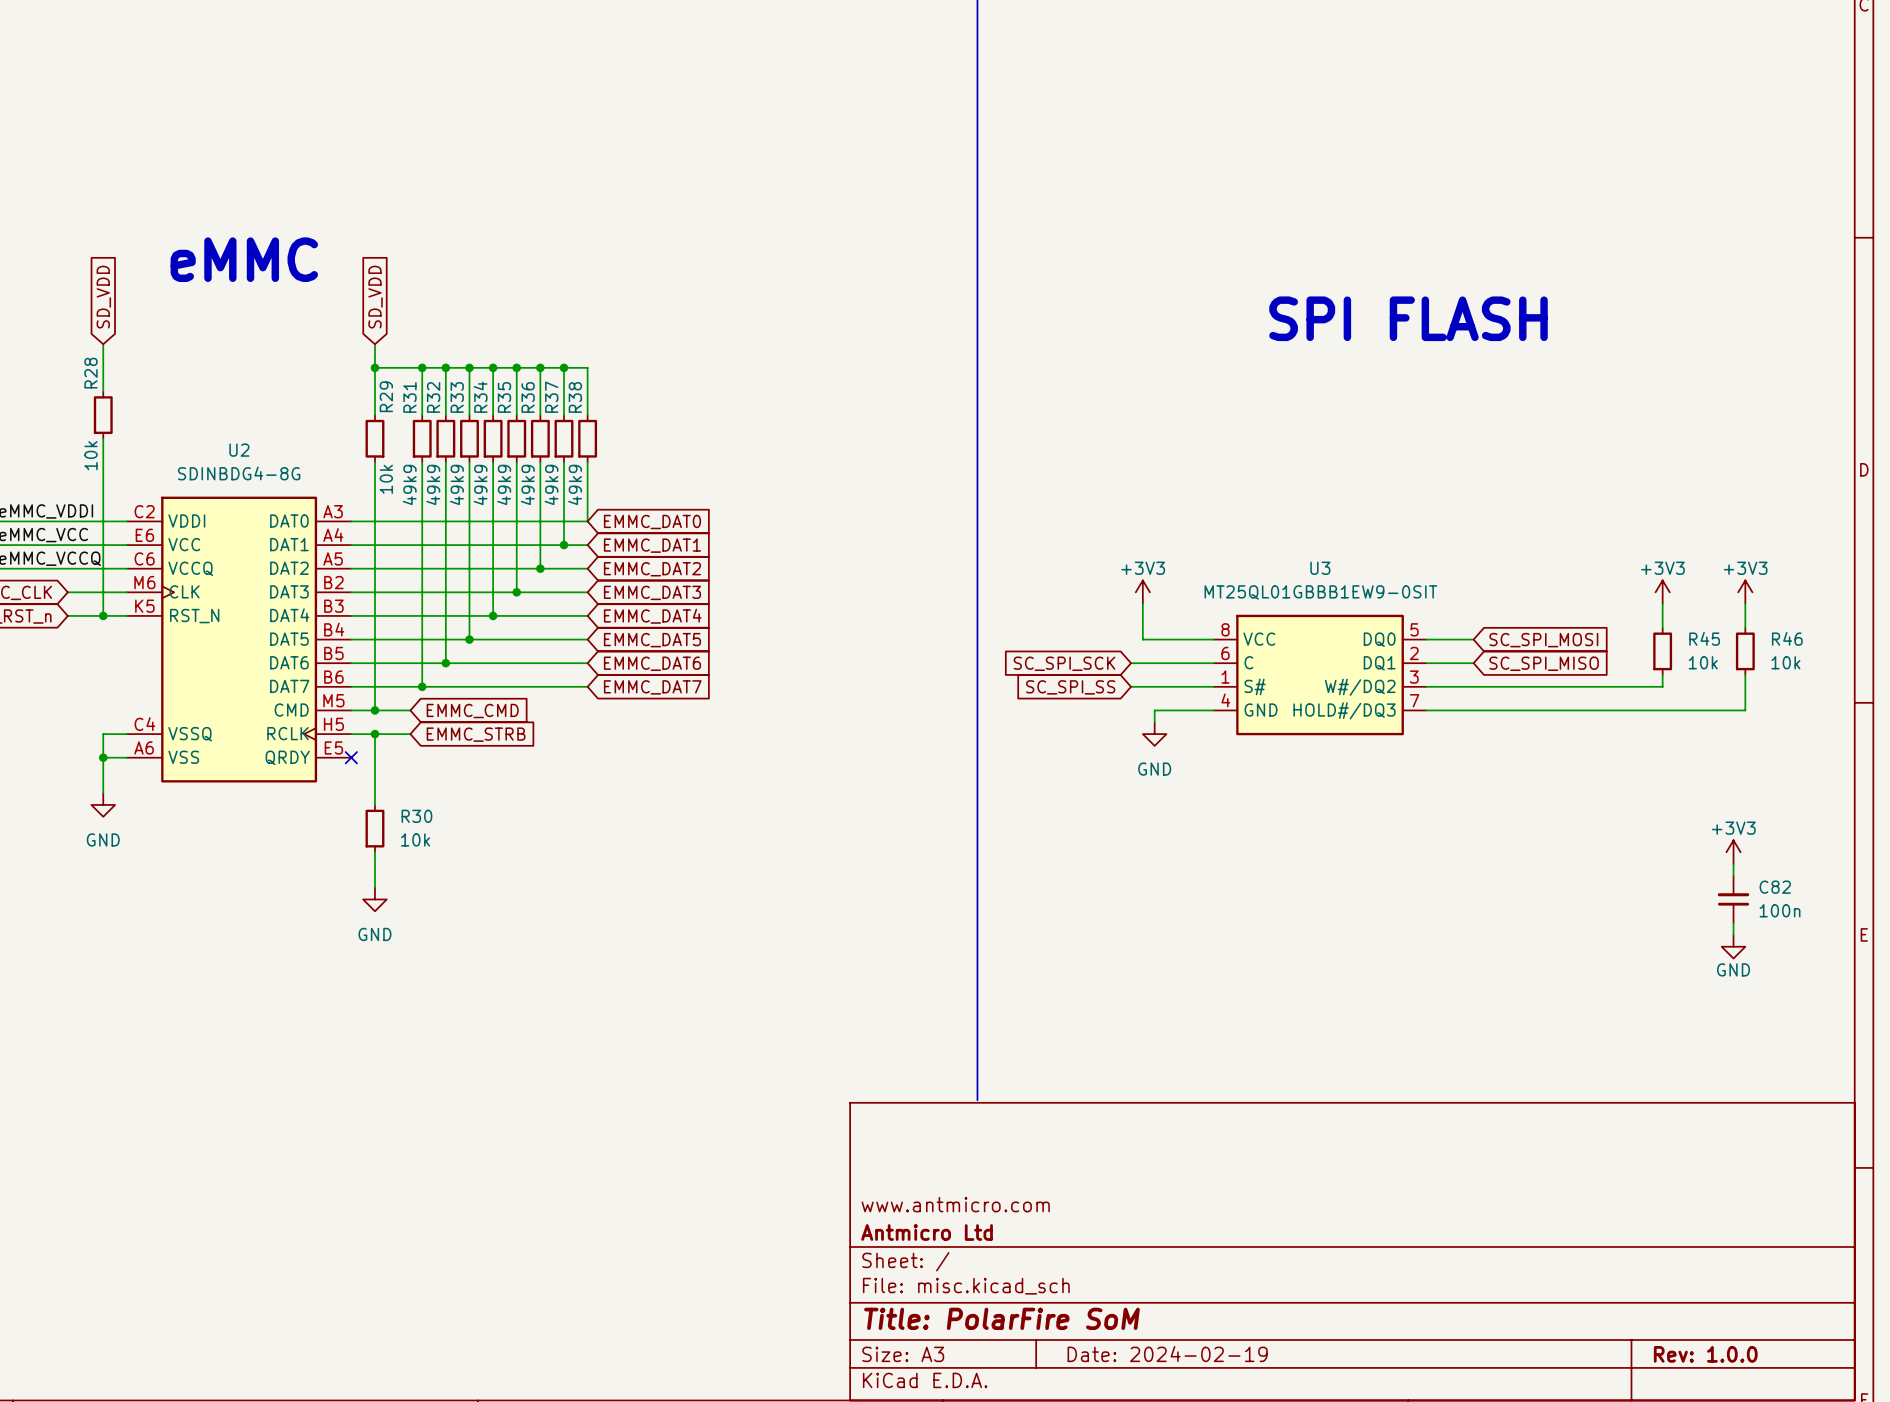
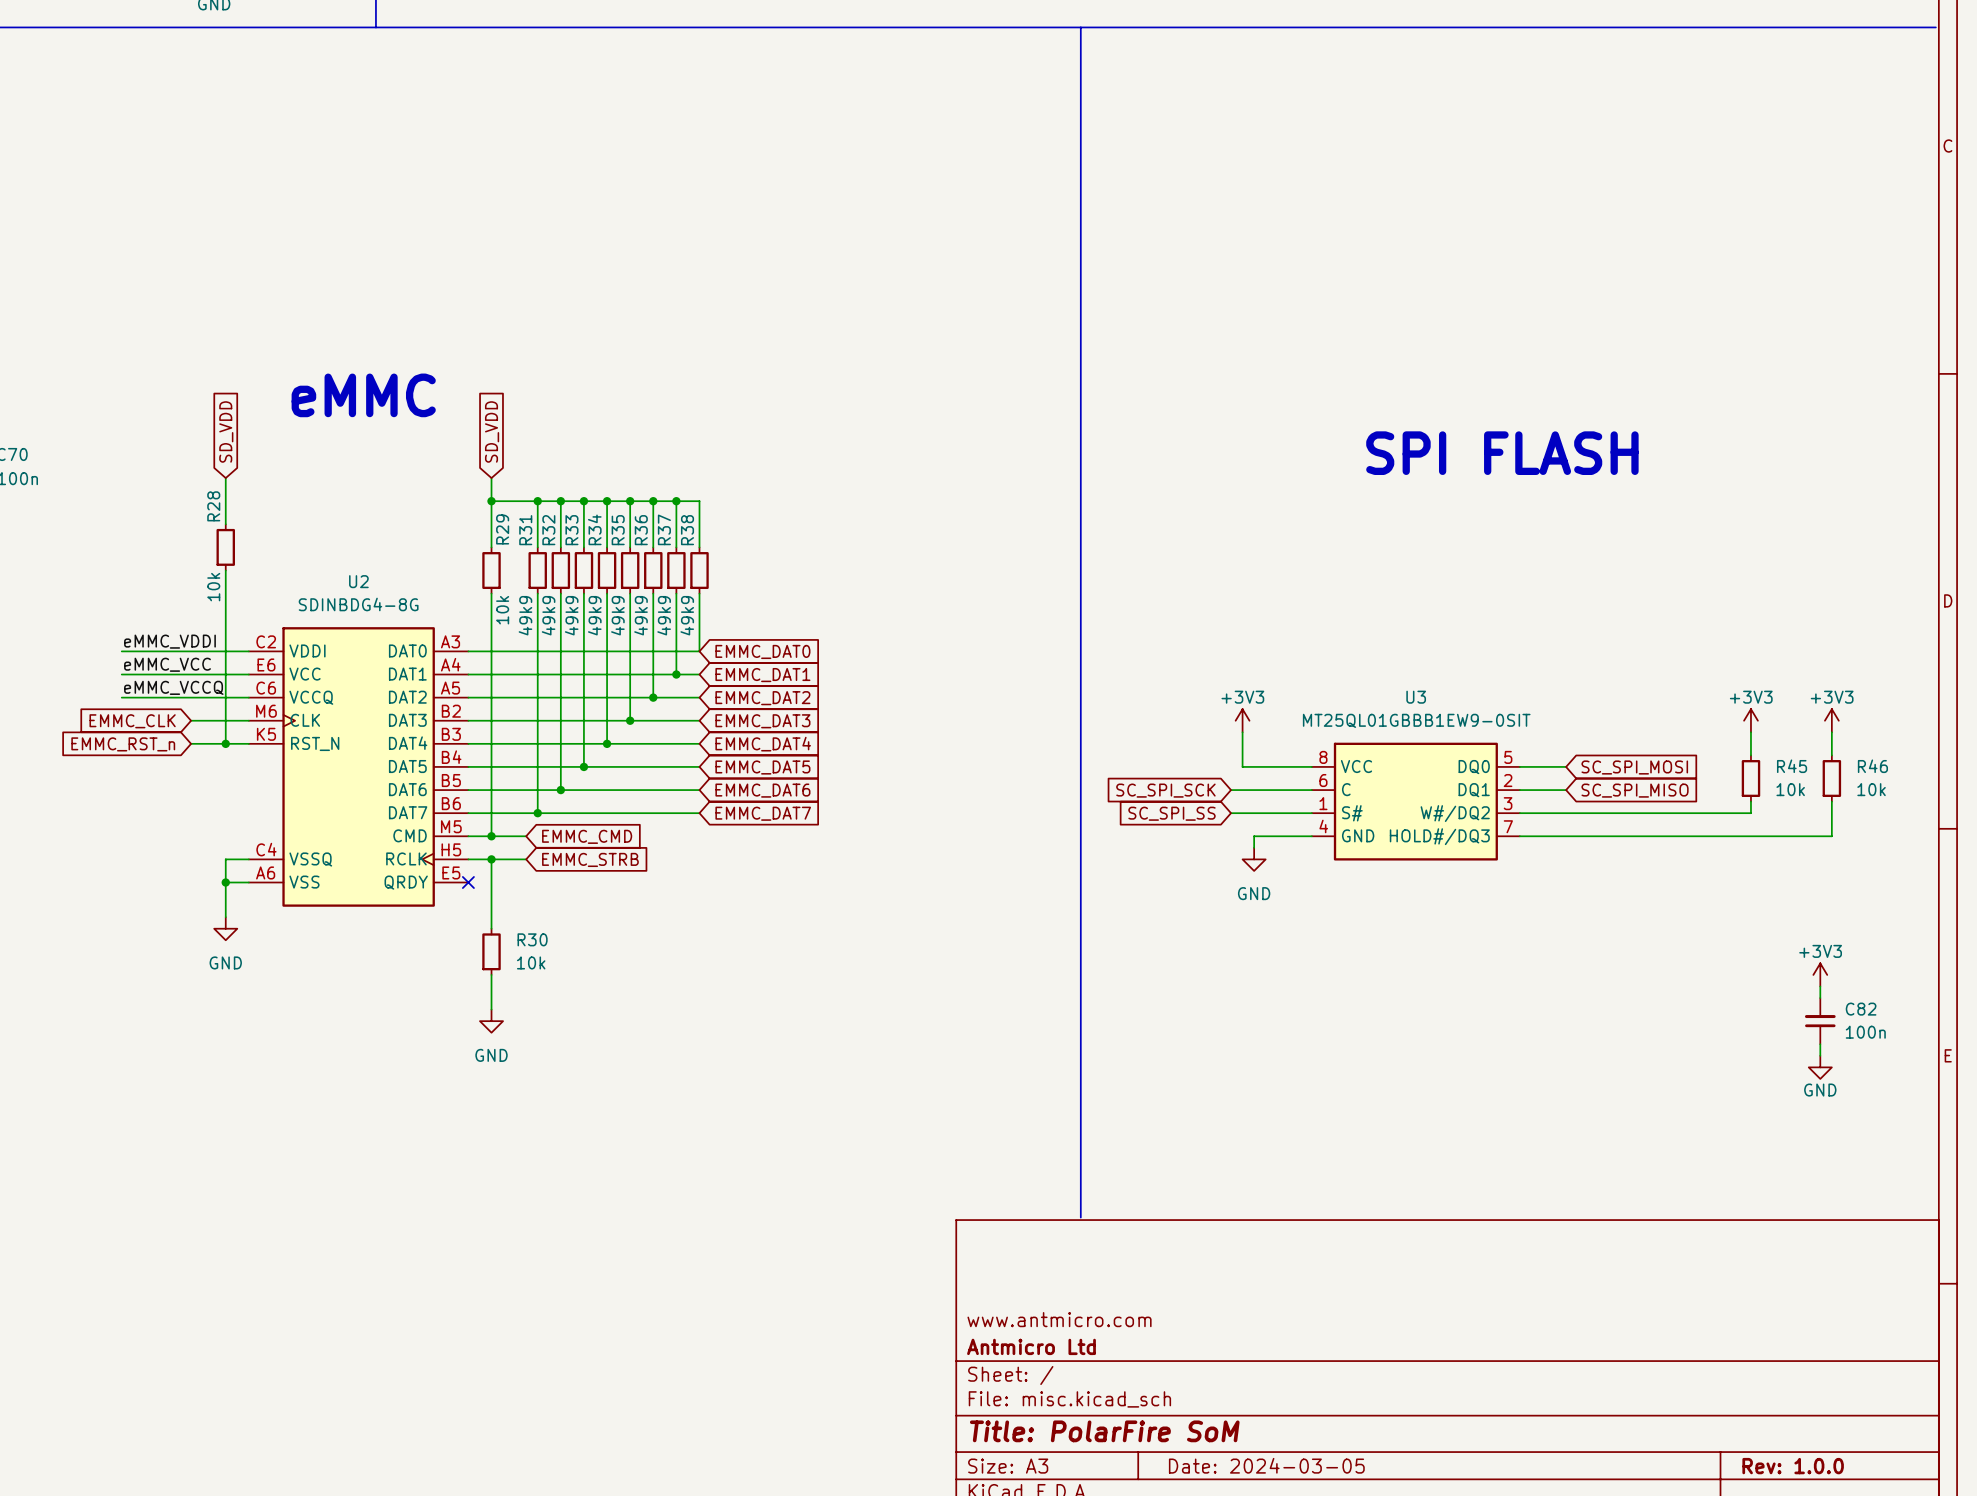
title block: Date: 2024-02-19 (1167, 1354) -> Date: 2024-03-05 (1266, 1465)

